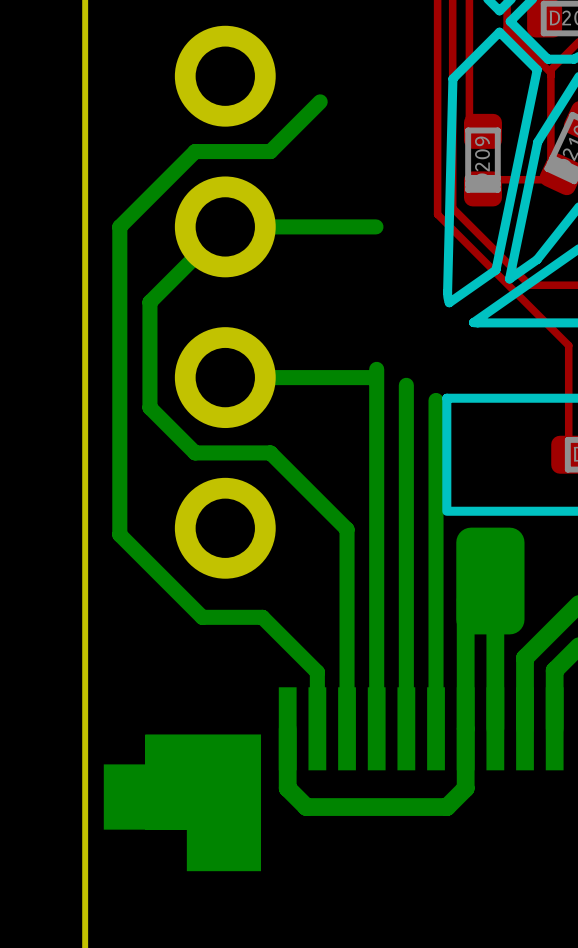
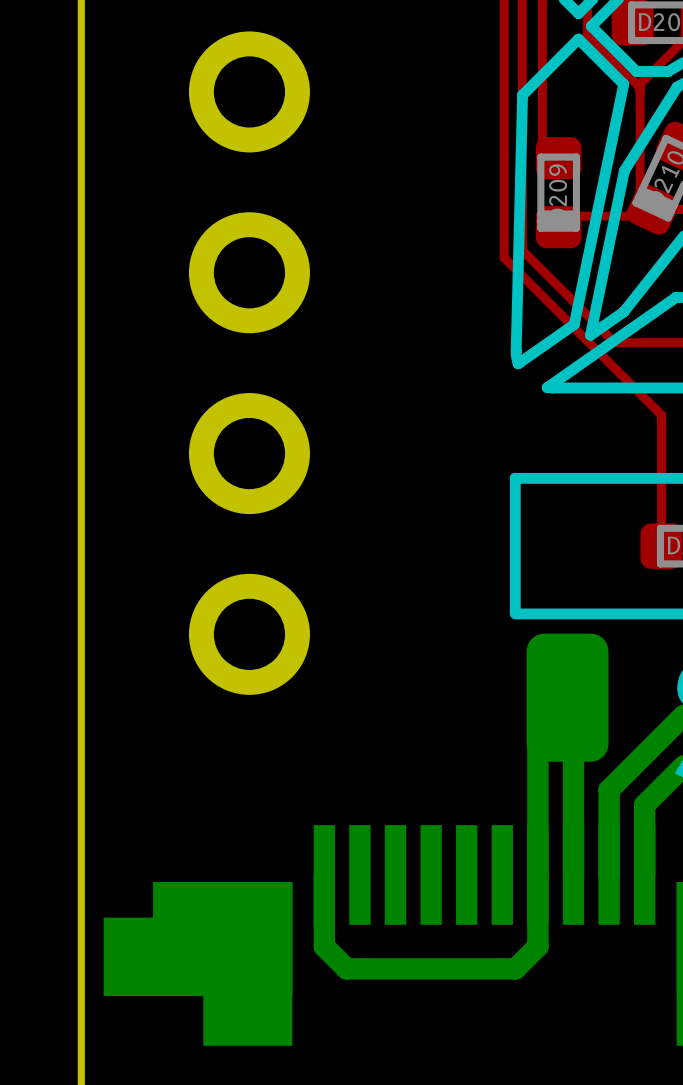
bottom track: (320, 101) (270, 151) (195, 151) (119, 226) (119, 534) (202, 617) (262, 617) (317, 672) (317, 728) -> none
bottom track: (375, 226) (225, 226) (149, 302) (149, 407) (195, 452) (270, 452) (347, 529) (347, 728) -> none
bottom track: (376, 369) (376, 728) -> none
bottom track: (225, 377) (375, 377) -> none
bottom track: (406, 385) (406, 728) -> none
bottom track: (436, 400) (436, 728) -> none

